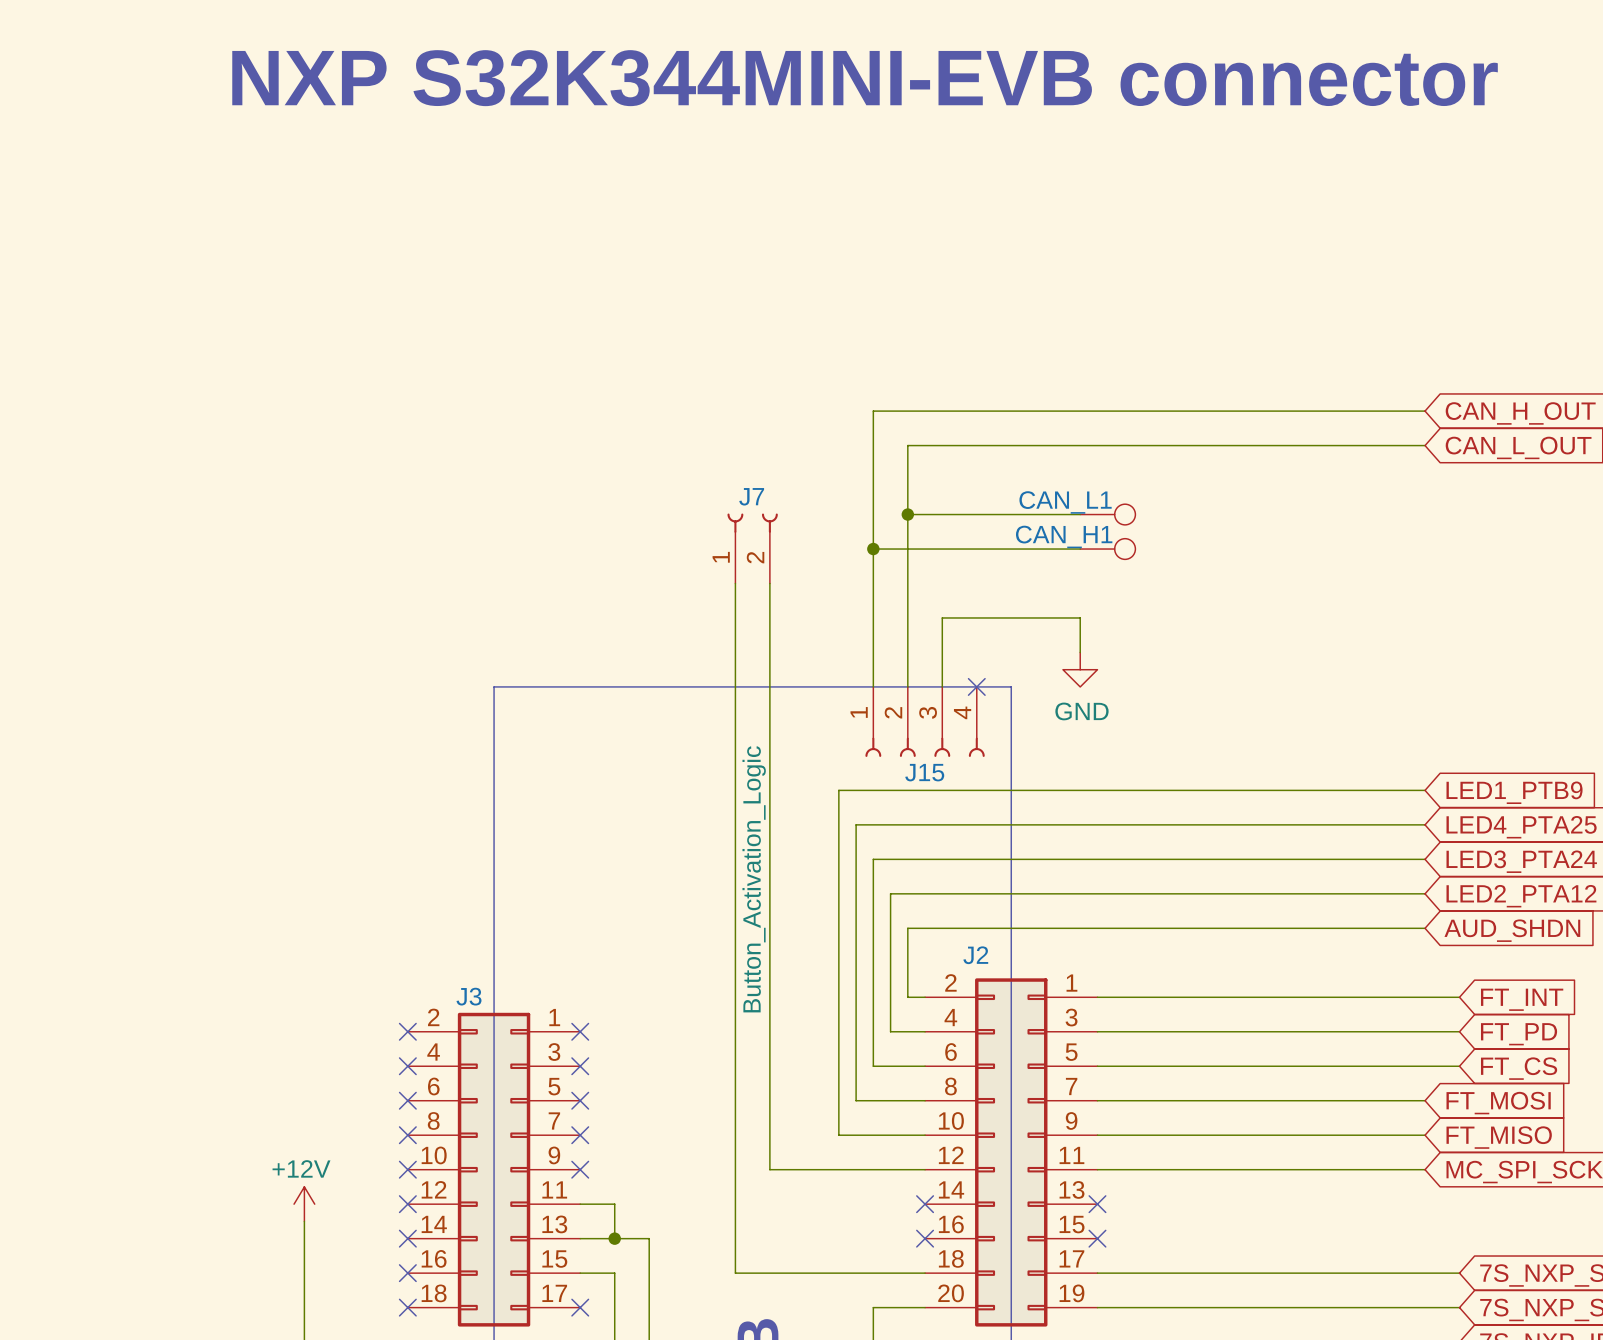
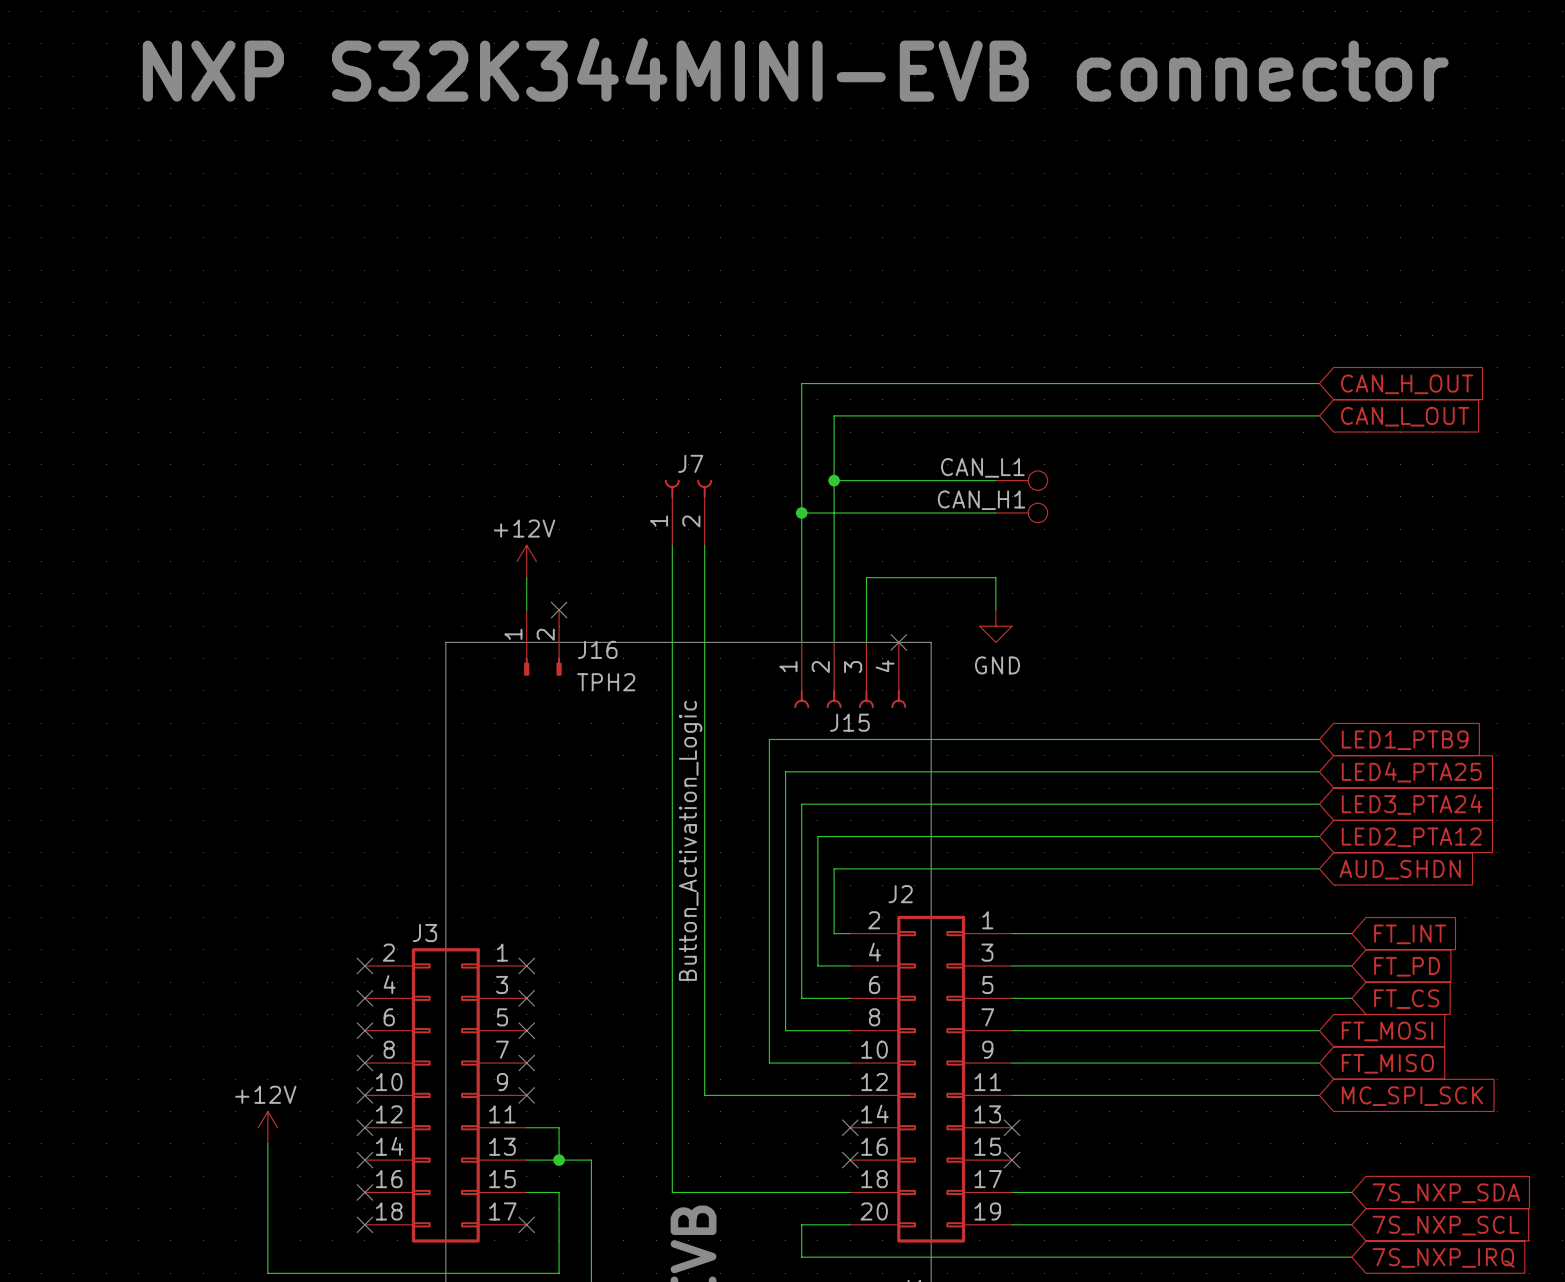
power symbol: none -> +12V (526, 561)
wire: none -> (526, 577) (526, 610)
no-connect mark: none -> (559, 610)
J16: none -> TPH2 (542, 642)

